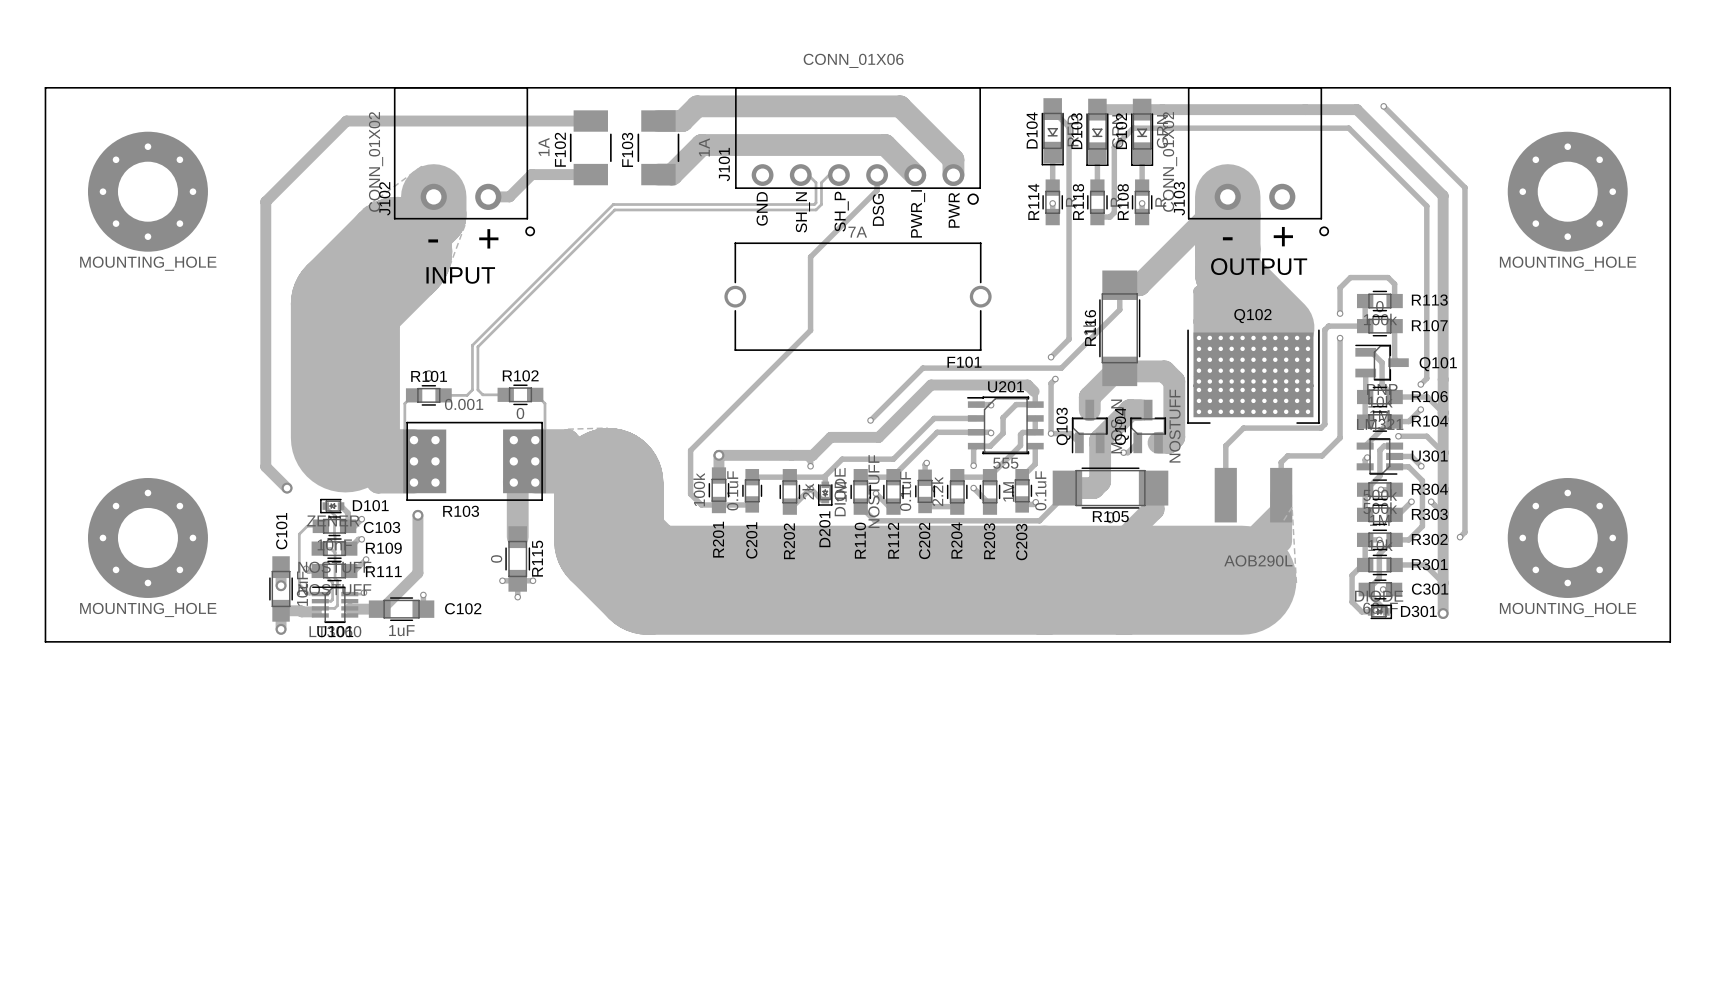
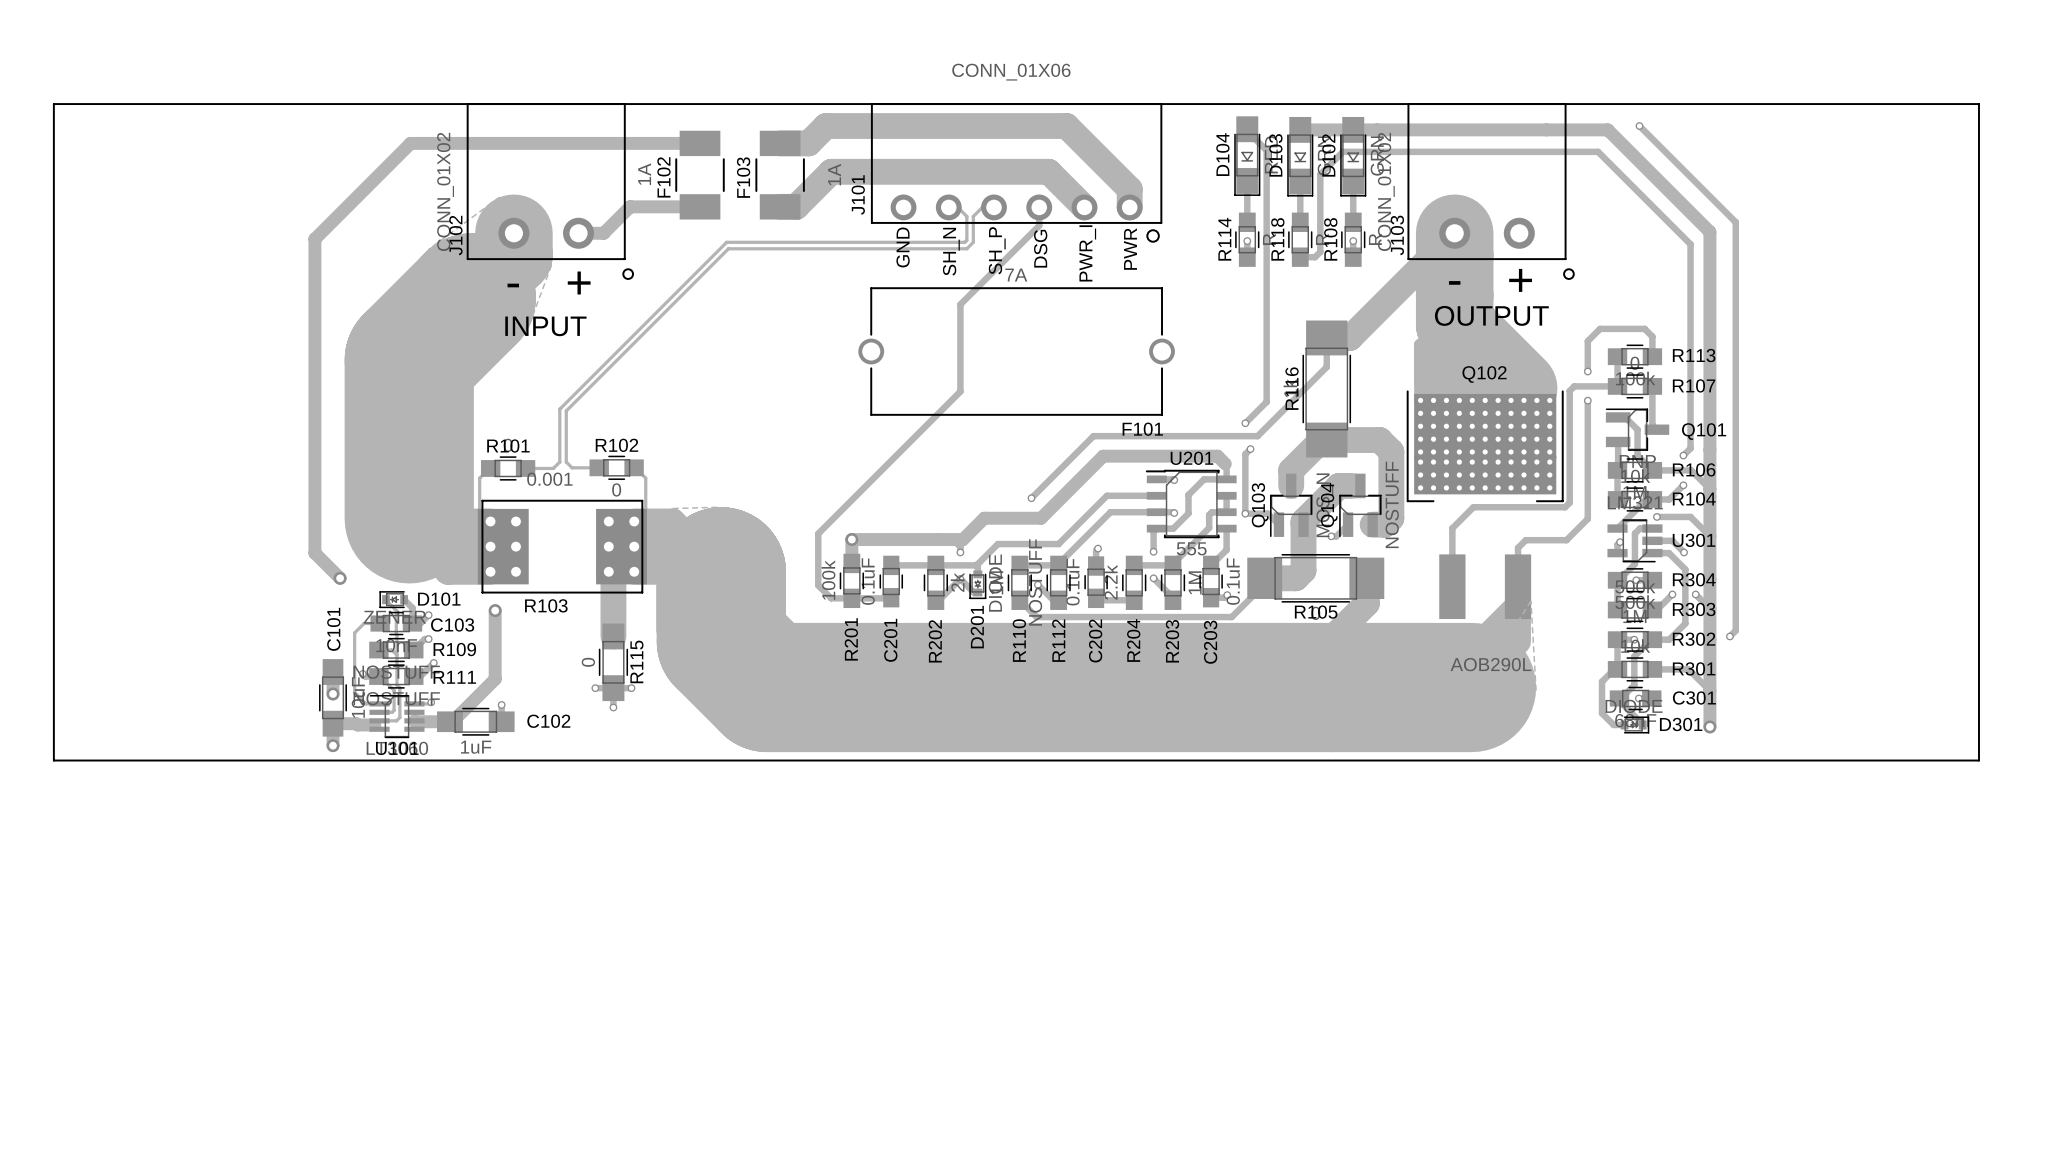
part: MOUNTING_HOLE (147, 191) -> none
part: MOUNTING_HOLE (1567, 191) -> none
part: MOUNTING_HOLE (147, 537) -> none
part: MOUNTING_HOLE (1567, 537) -> none

